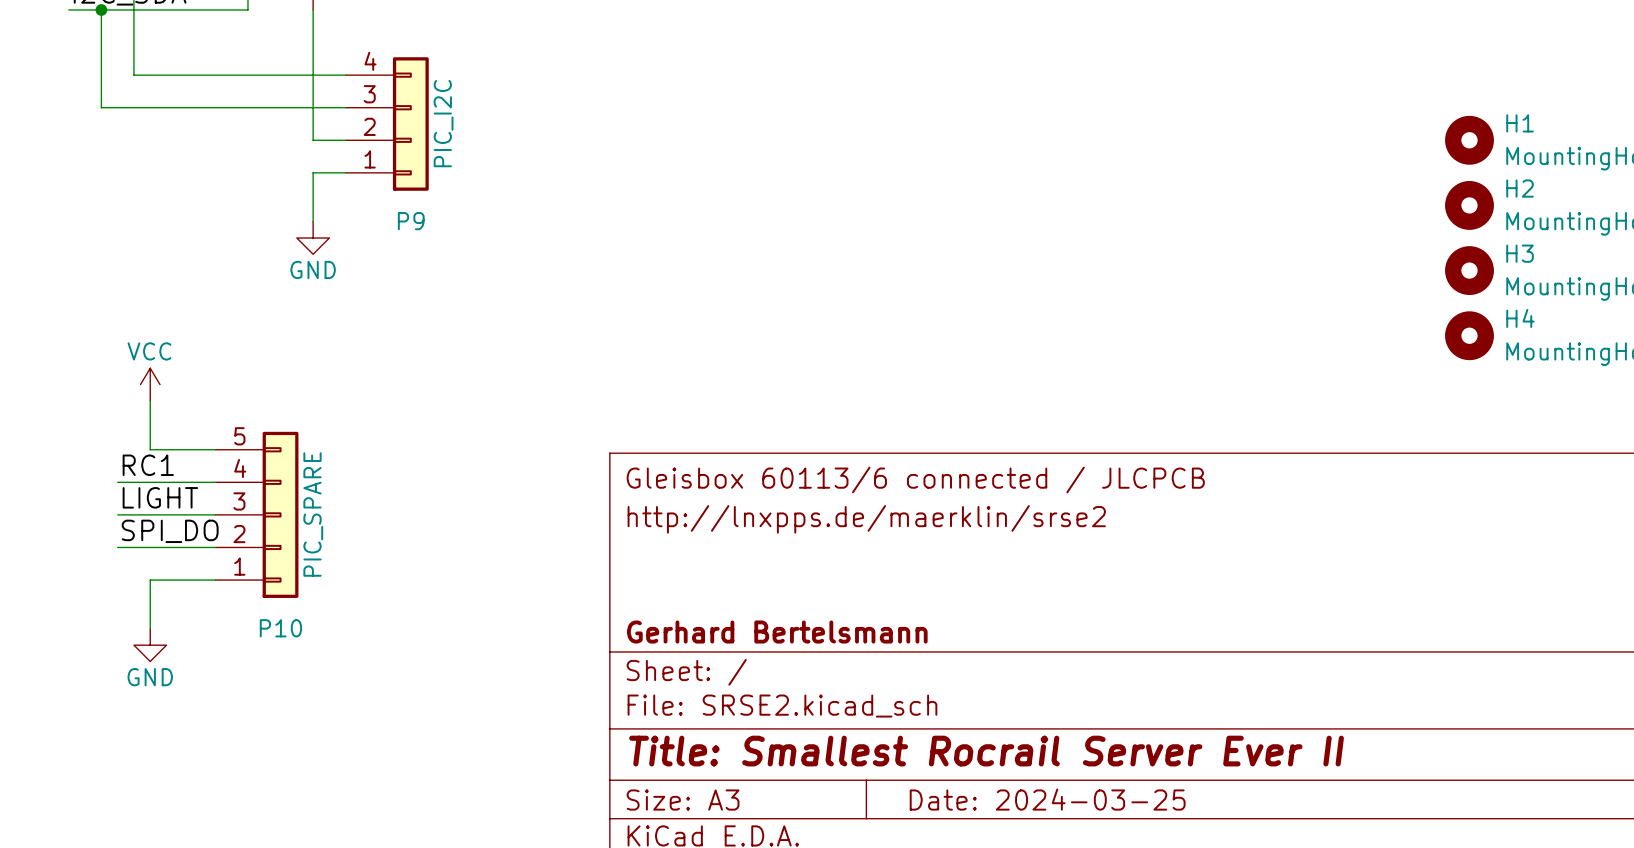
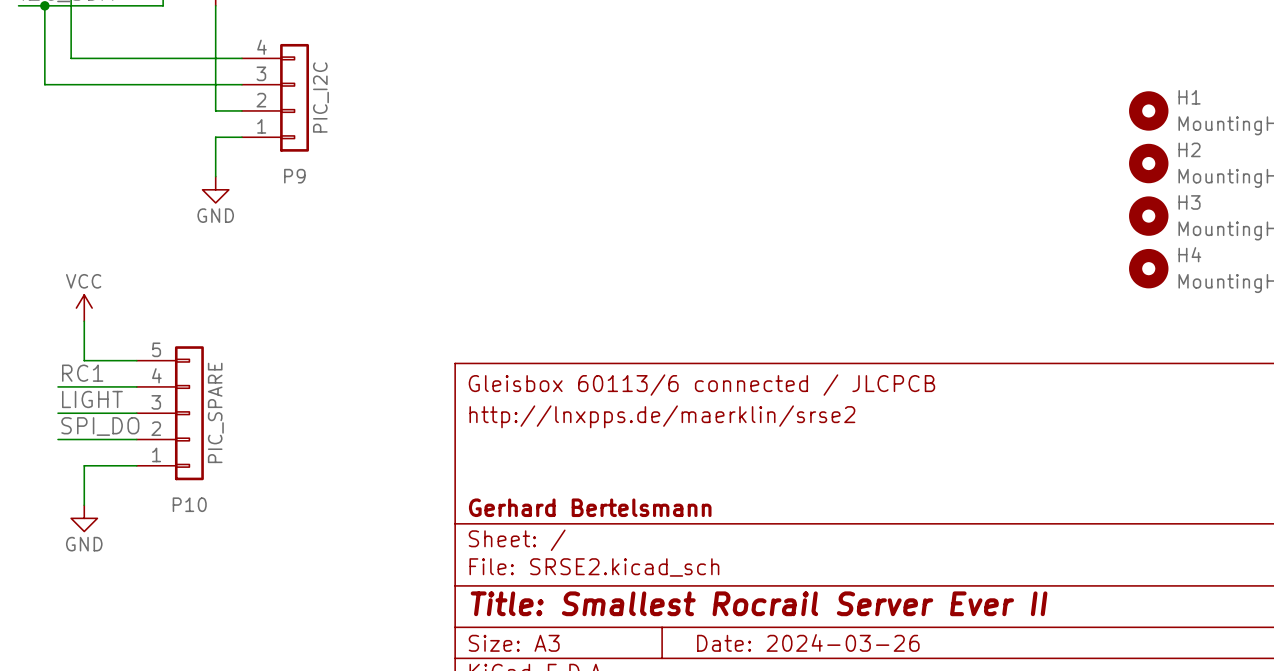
title block: Date: 2024-03-25 (1047, 799) -> Date: 2024-03-26 (808, 642)

